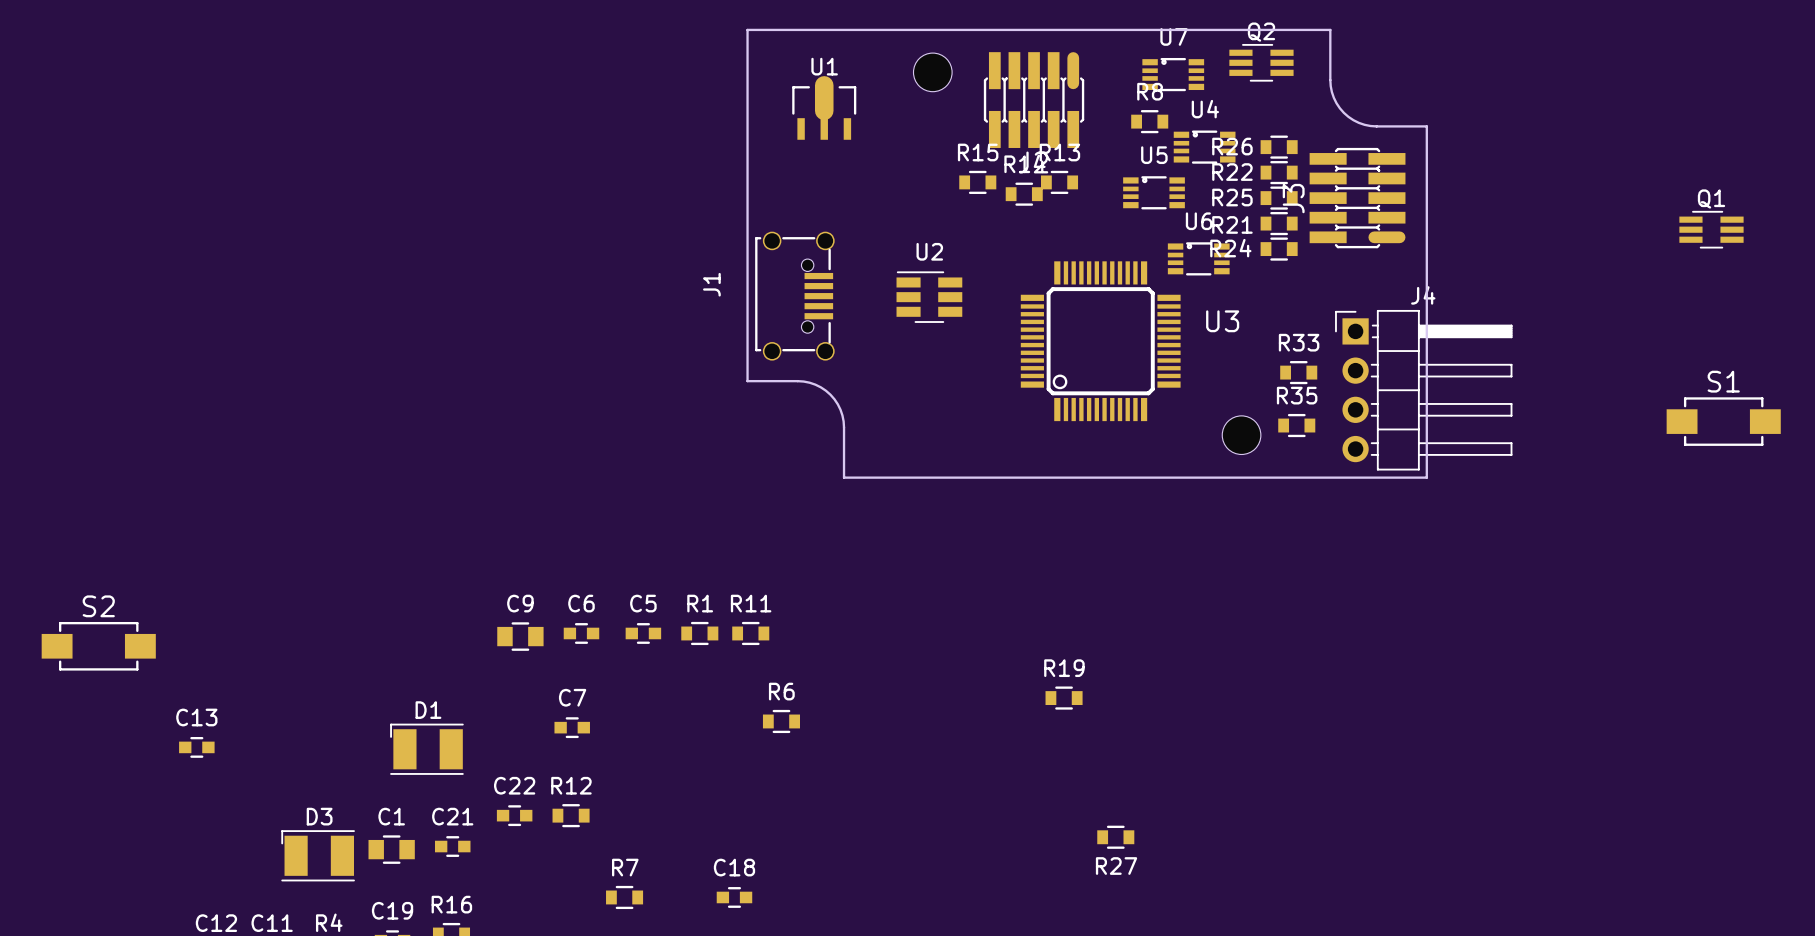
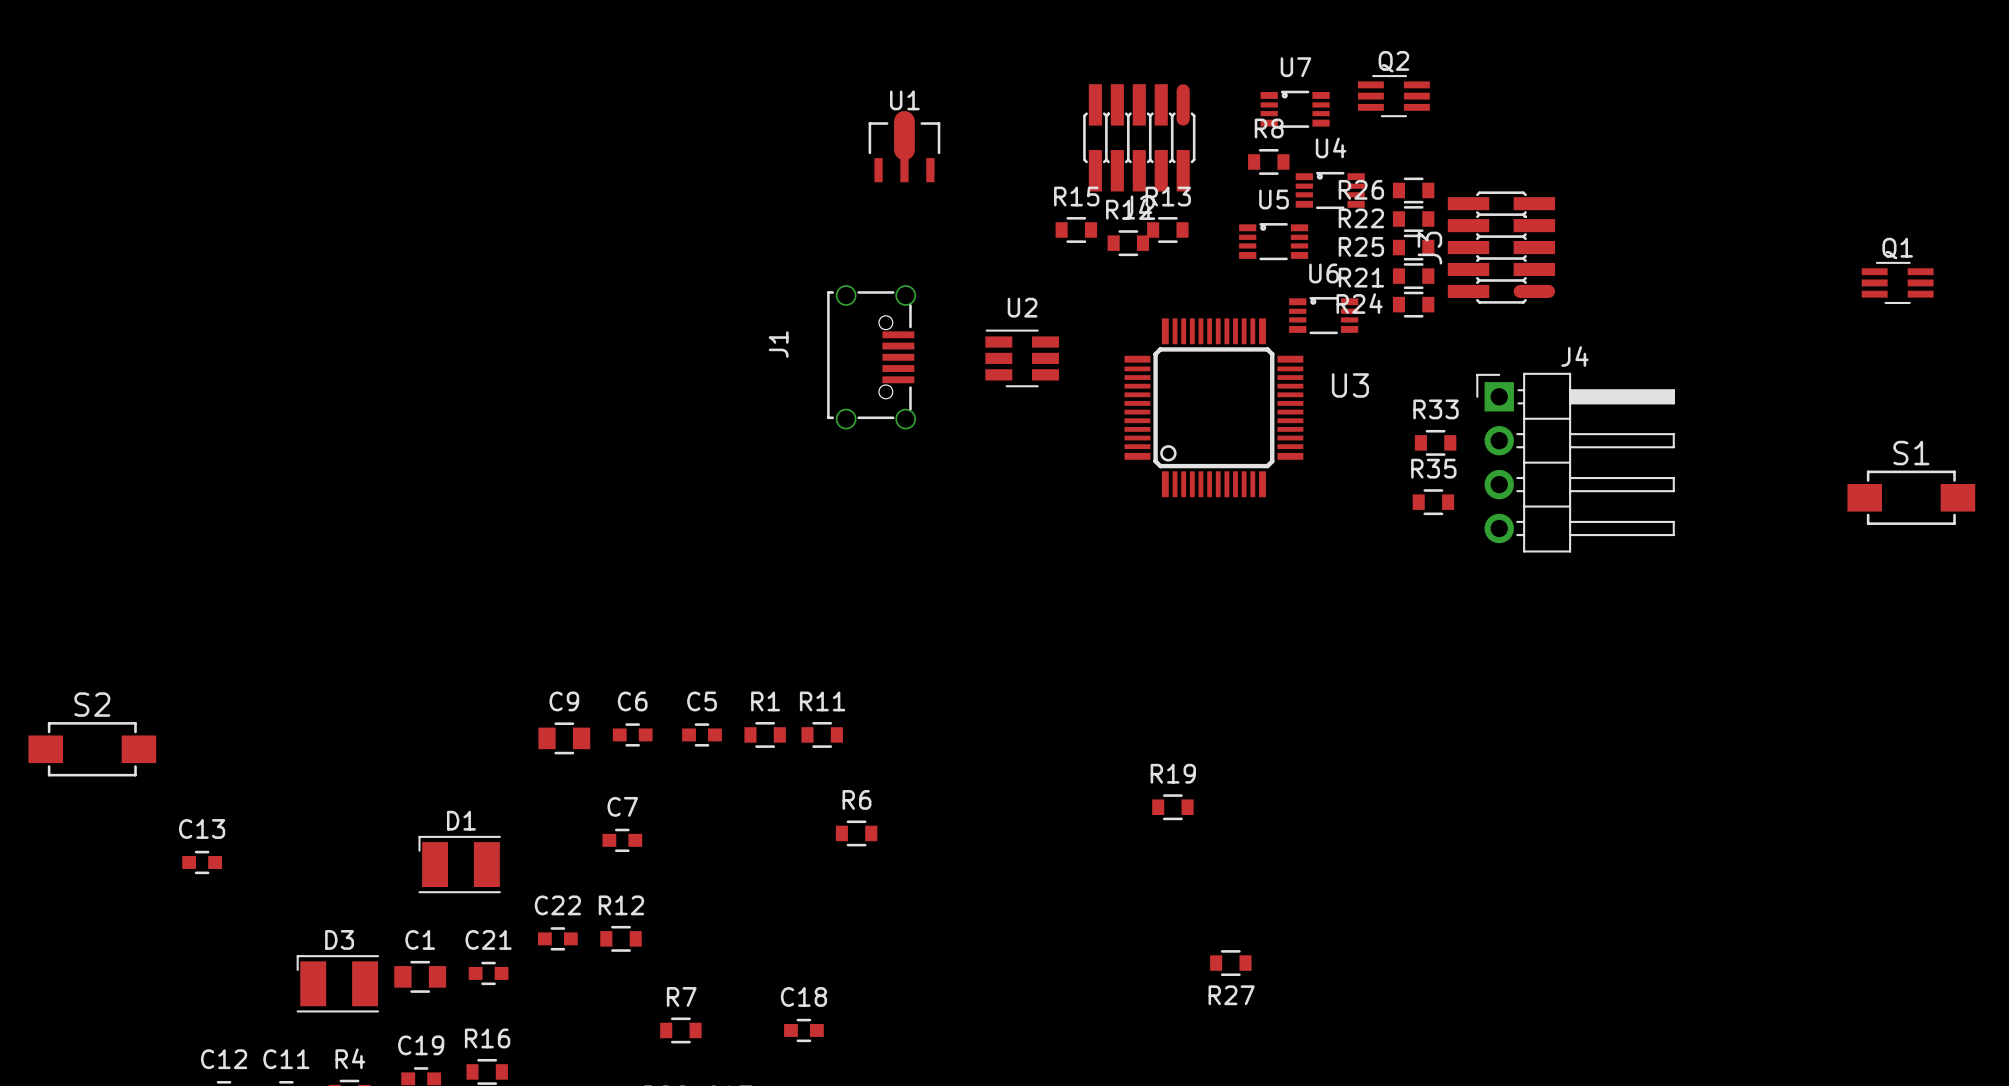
board edge: (747, 29) (747, 381) (803, 381) (815, 384) (830, 394) (840, 409) (843, 421) (844, 477) (1426, 477) (1426, 126) (1370, 126) (1358, 122) (1343, 112) (1333, 97) (1330, 86) (1330, 29) (747, 29) -> none
part: (932, 72) -> none
part: (1241, 435) -> none

